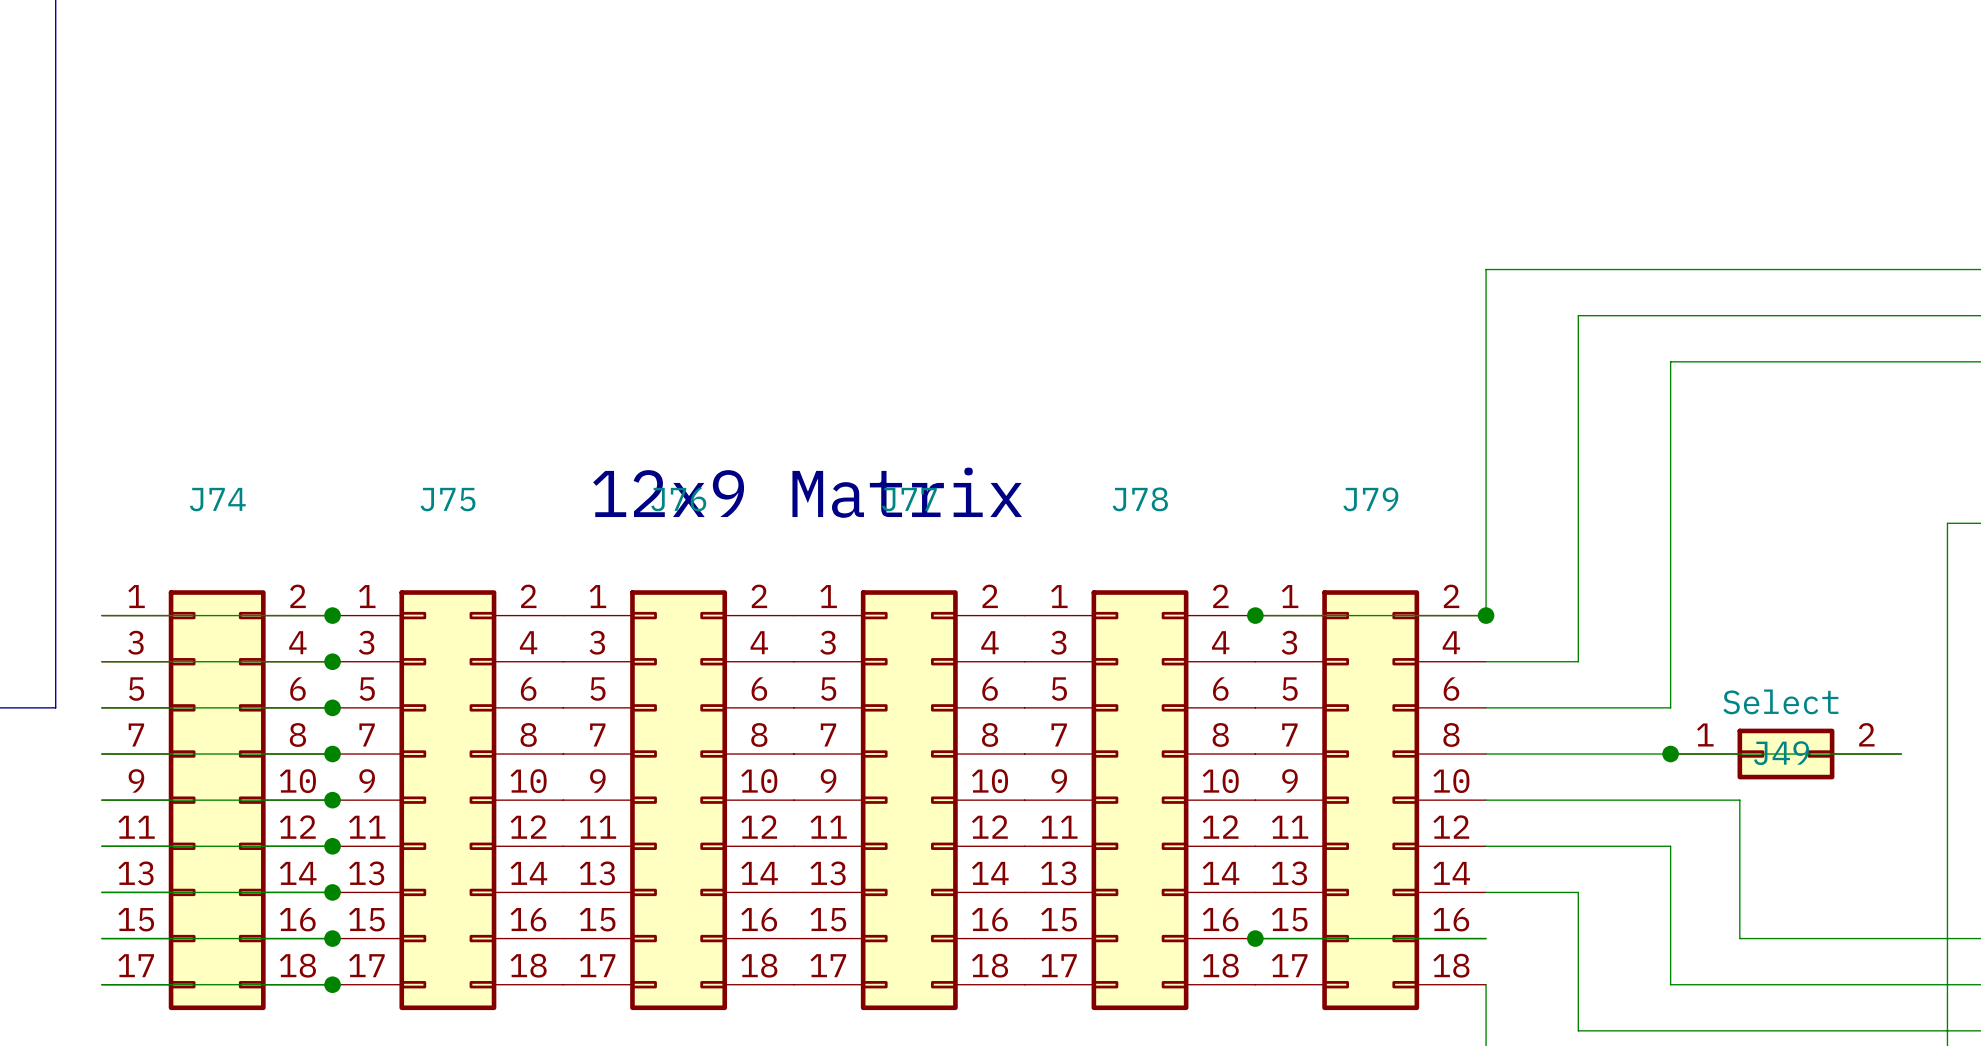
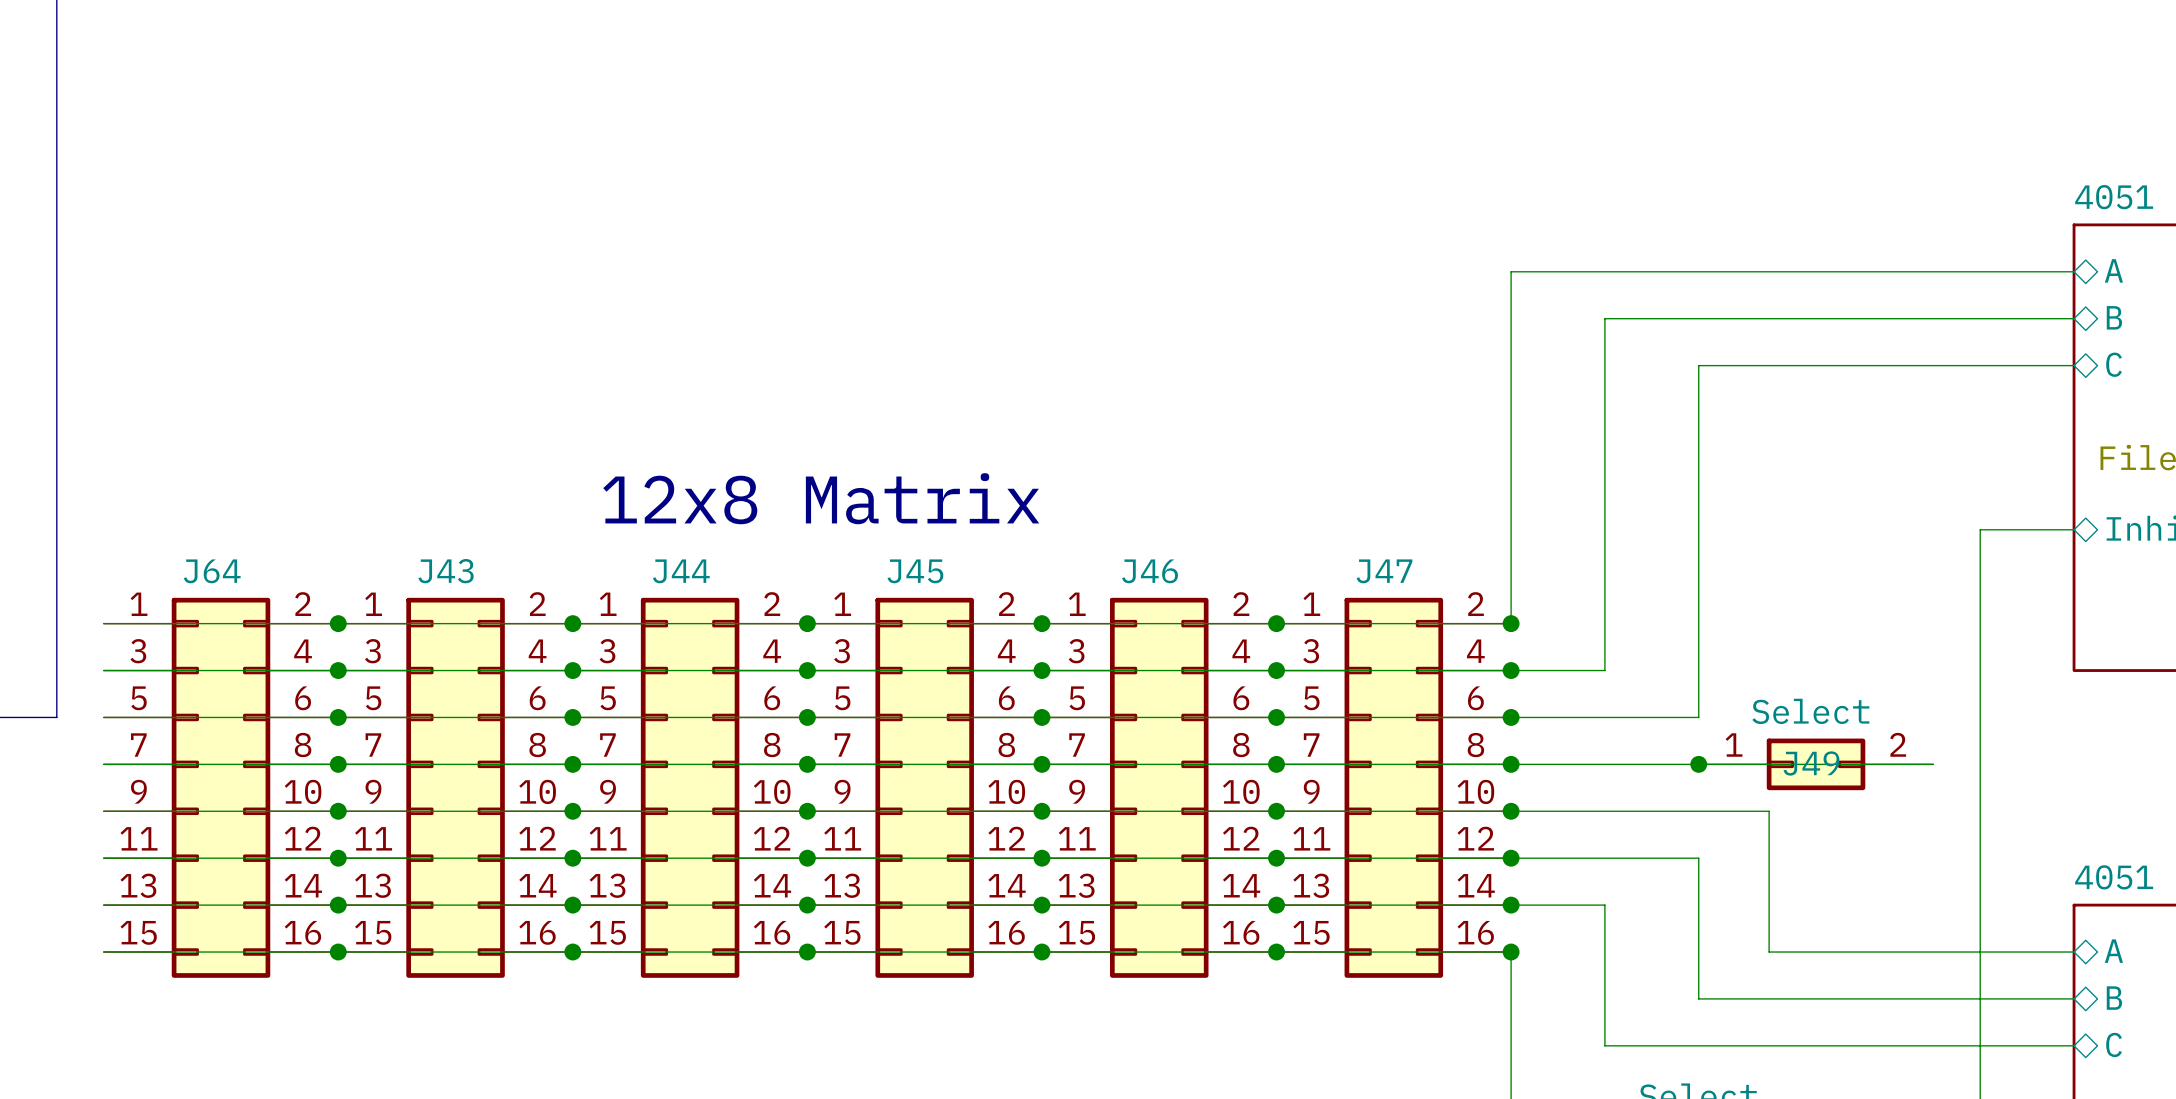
text: 12x9 Matrix (807, 492) -> 12x8 Matrix (821, 498)
junction: none -> (572, 623)
junction: none -> (807, 623)
junction: none -> (1041, 623)
junction: none -> (572, 670)
junction: none -> (807, 670)
junction: none -> (1041, 670)
junction: none -> (1276, 670)
junction: none -> (1511, 670)
junction: none -> (572, 717)
junction: none -> (807, 717)
junction: none -> (1041, 717)
junction: none -> (1276, 717)
junction: none -> (1511, 717)
junction: none -> (572, 764)
junction: none -> (807, 764)
junction: none -> (1041, 764)
junction: none -> (1276, 764)
junction: none -> (1511, 764)
J64: none -> (221, 787)
J43: none -> (455, 787)
J44: none -> (690, 787)
J45: none -> (924, 787)
J46: none -> (1159, 787)
J47: none -> (1393, 787)
J74: (217, 800) -> none
J75: (447, 800) -> none
junction: none -> (572, 811)
J76: (678, 800) -> none
junction: none -> (807, 811)
J77: (909, 800) -> none
junction: none -> (1041, 811)
J78: (1140, 800) -> none
junction: none -> (1276, 811)
J79: (1370, 800) -> none
junction: none -> (1511, 811)
junction: none -> (572, 858)
junction: none -> (807, 858)
junction: none -> (1041, 858)
junction: none -> (1276, 858)
junction: none -> (1511, 858)
junction: none -> (572, 905)
junction: none -> (807, 905)
junction: none -> (1041, 905)
junction: none -> (1276, 905)
junction: none -> (1511, 905)
junction: none -> (572, 952)
junction: none -> (807, 952)
junction: none -> (1041, 952)
wire: none -> (1511, 952) (1511, 998)
junction: none -> (1511, 952)
wire: (101, 984) (332, 984) -> none
junction: (332, 984) -> none

